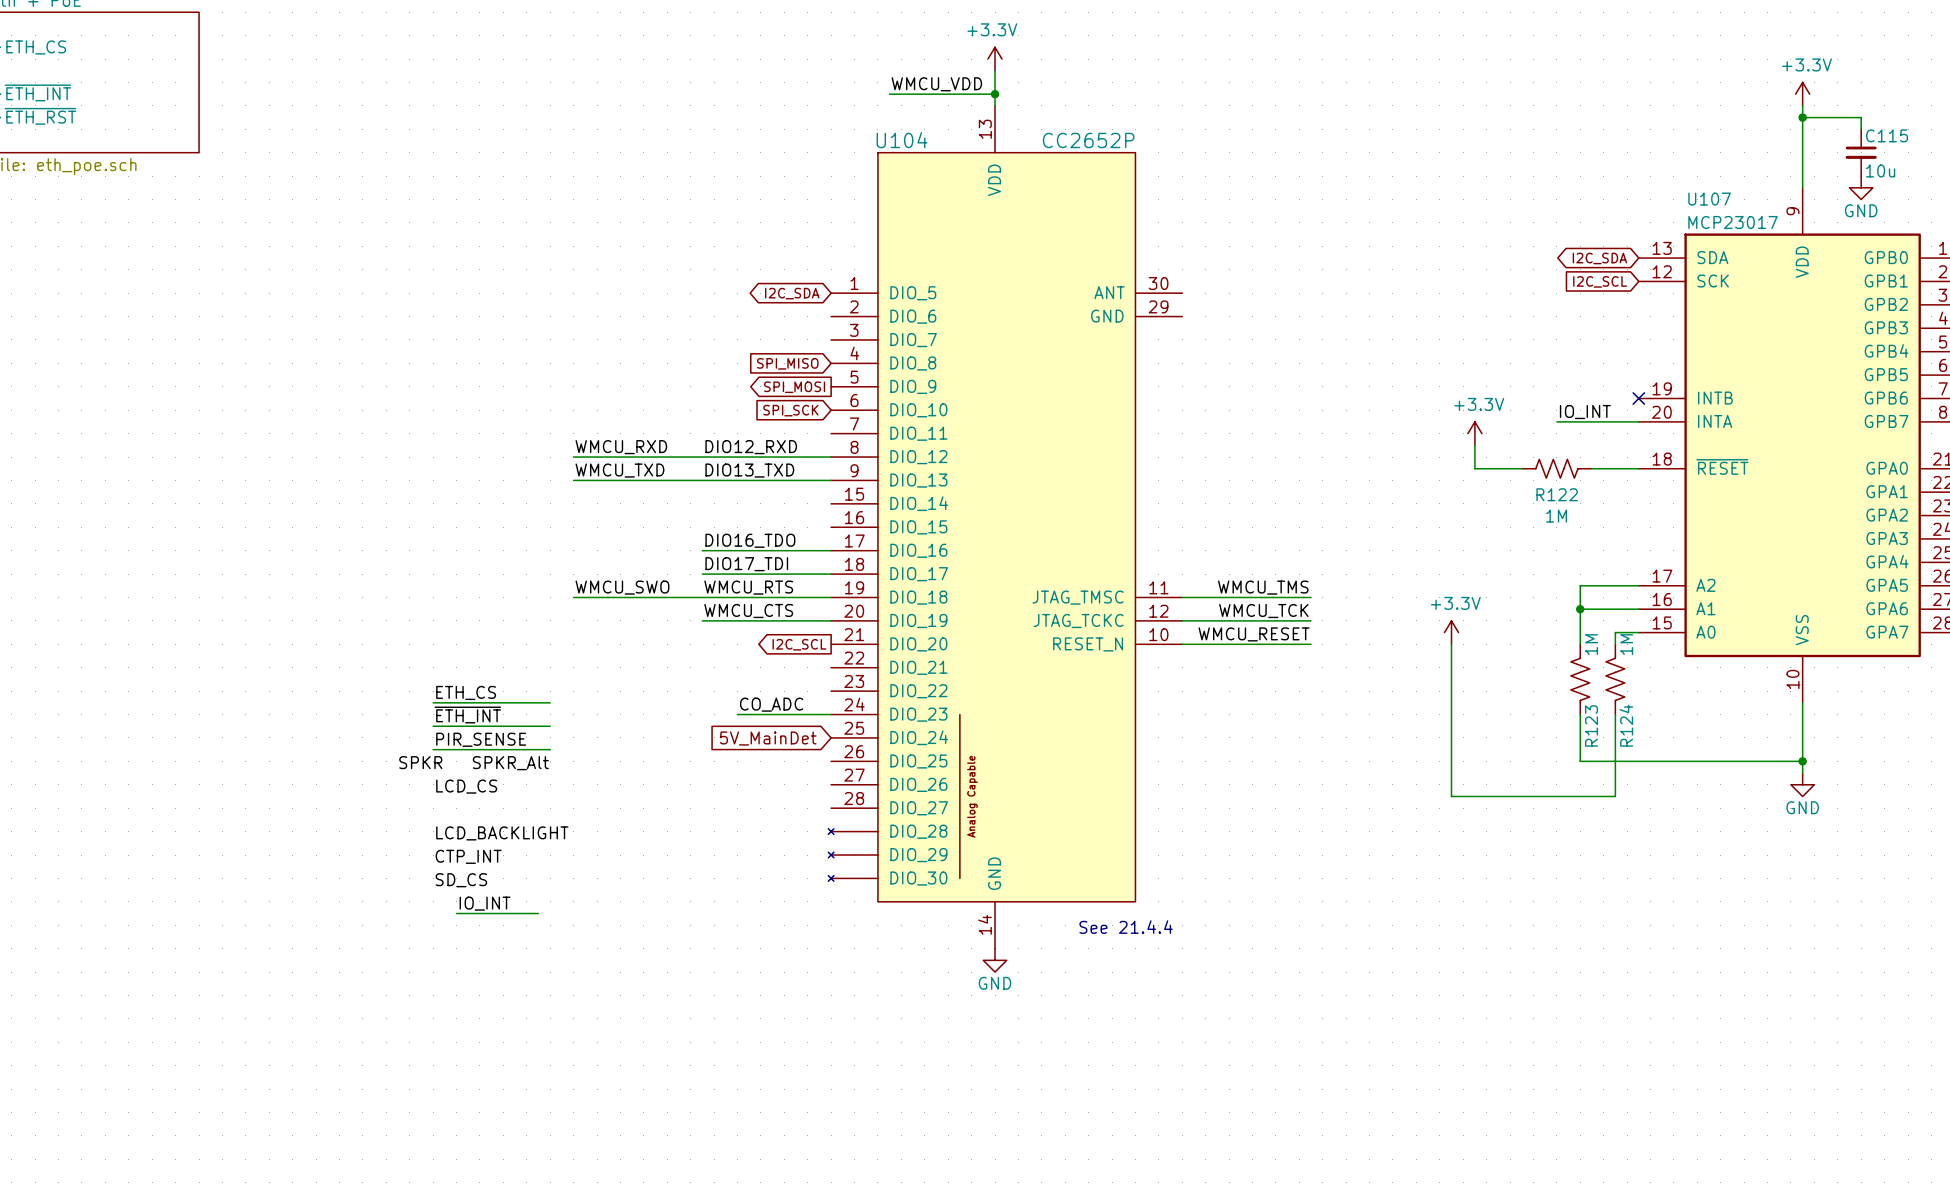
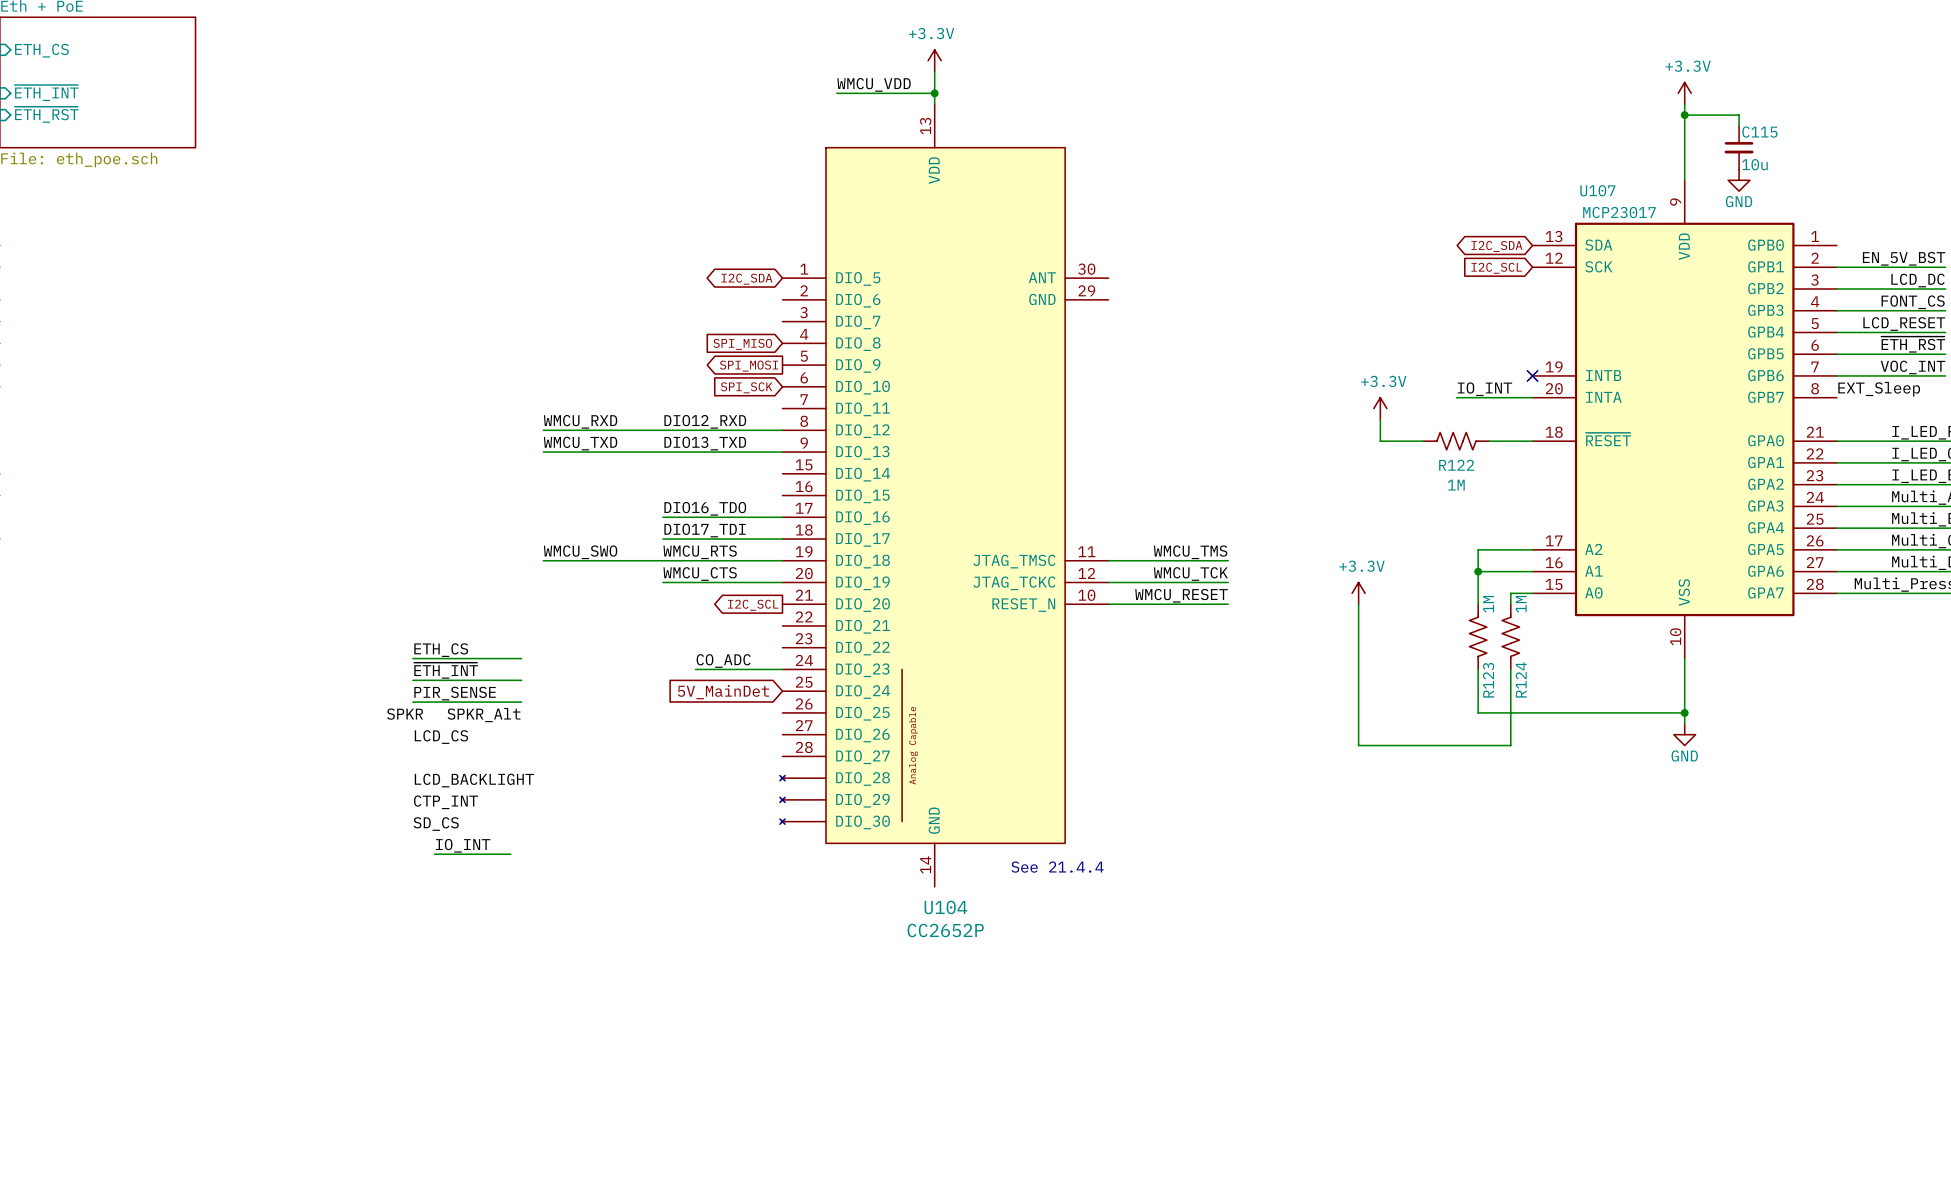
U104 name position: U104 (902, 140) -> U104 (945, 907)
U104 value position: CC2652P (1088, 140) -> CC2652P (945, 930)
power symbol: GND (995, 960) -> none

